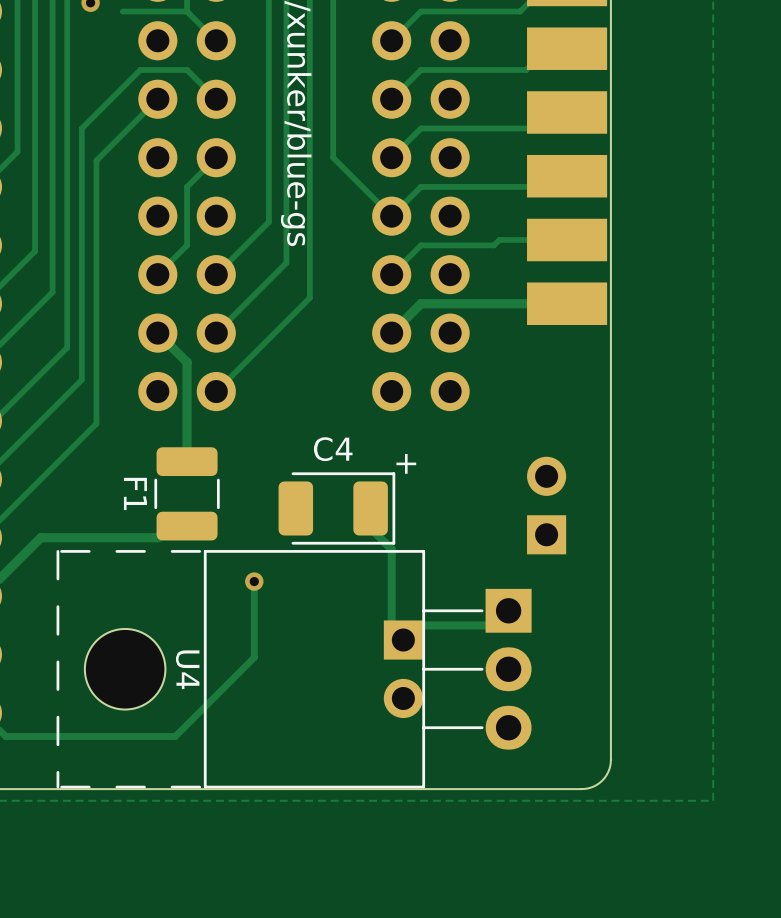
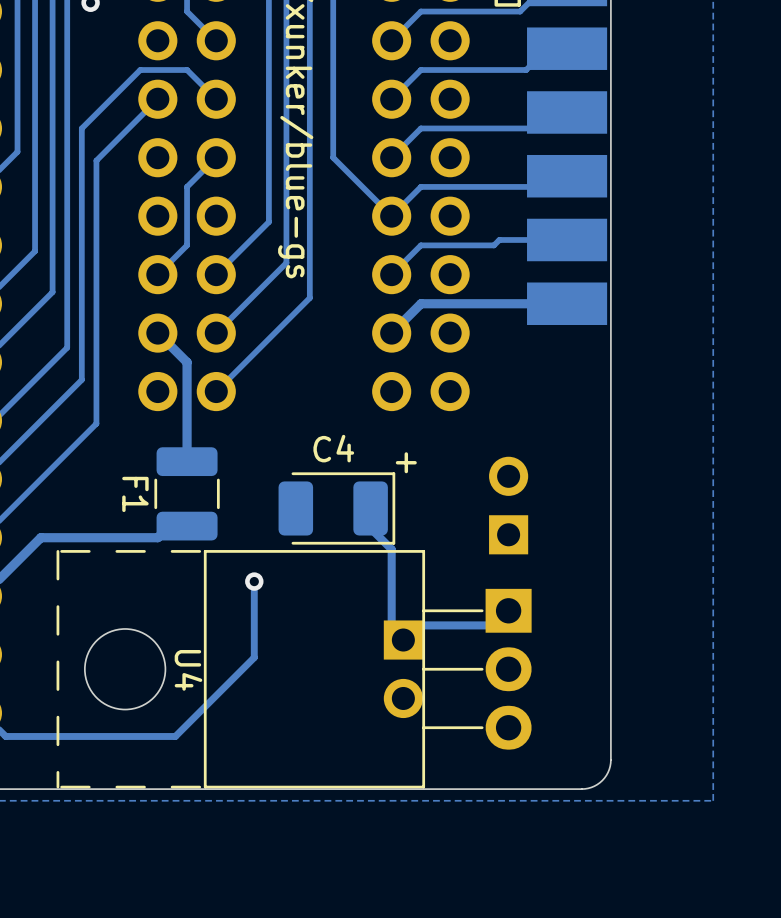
track: (187, 11) (122, 11) -> none
part position: (546, 505) -> (508, 505)

